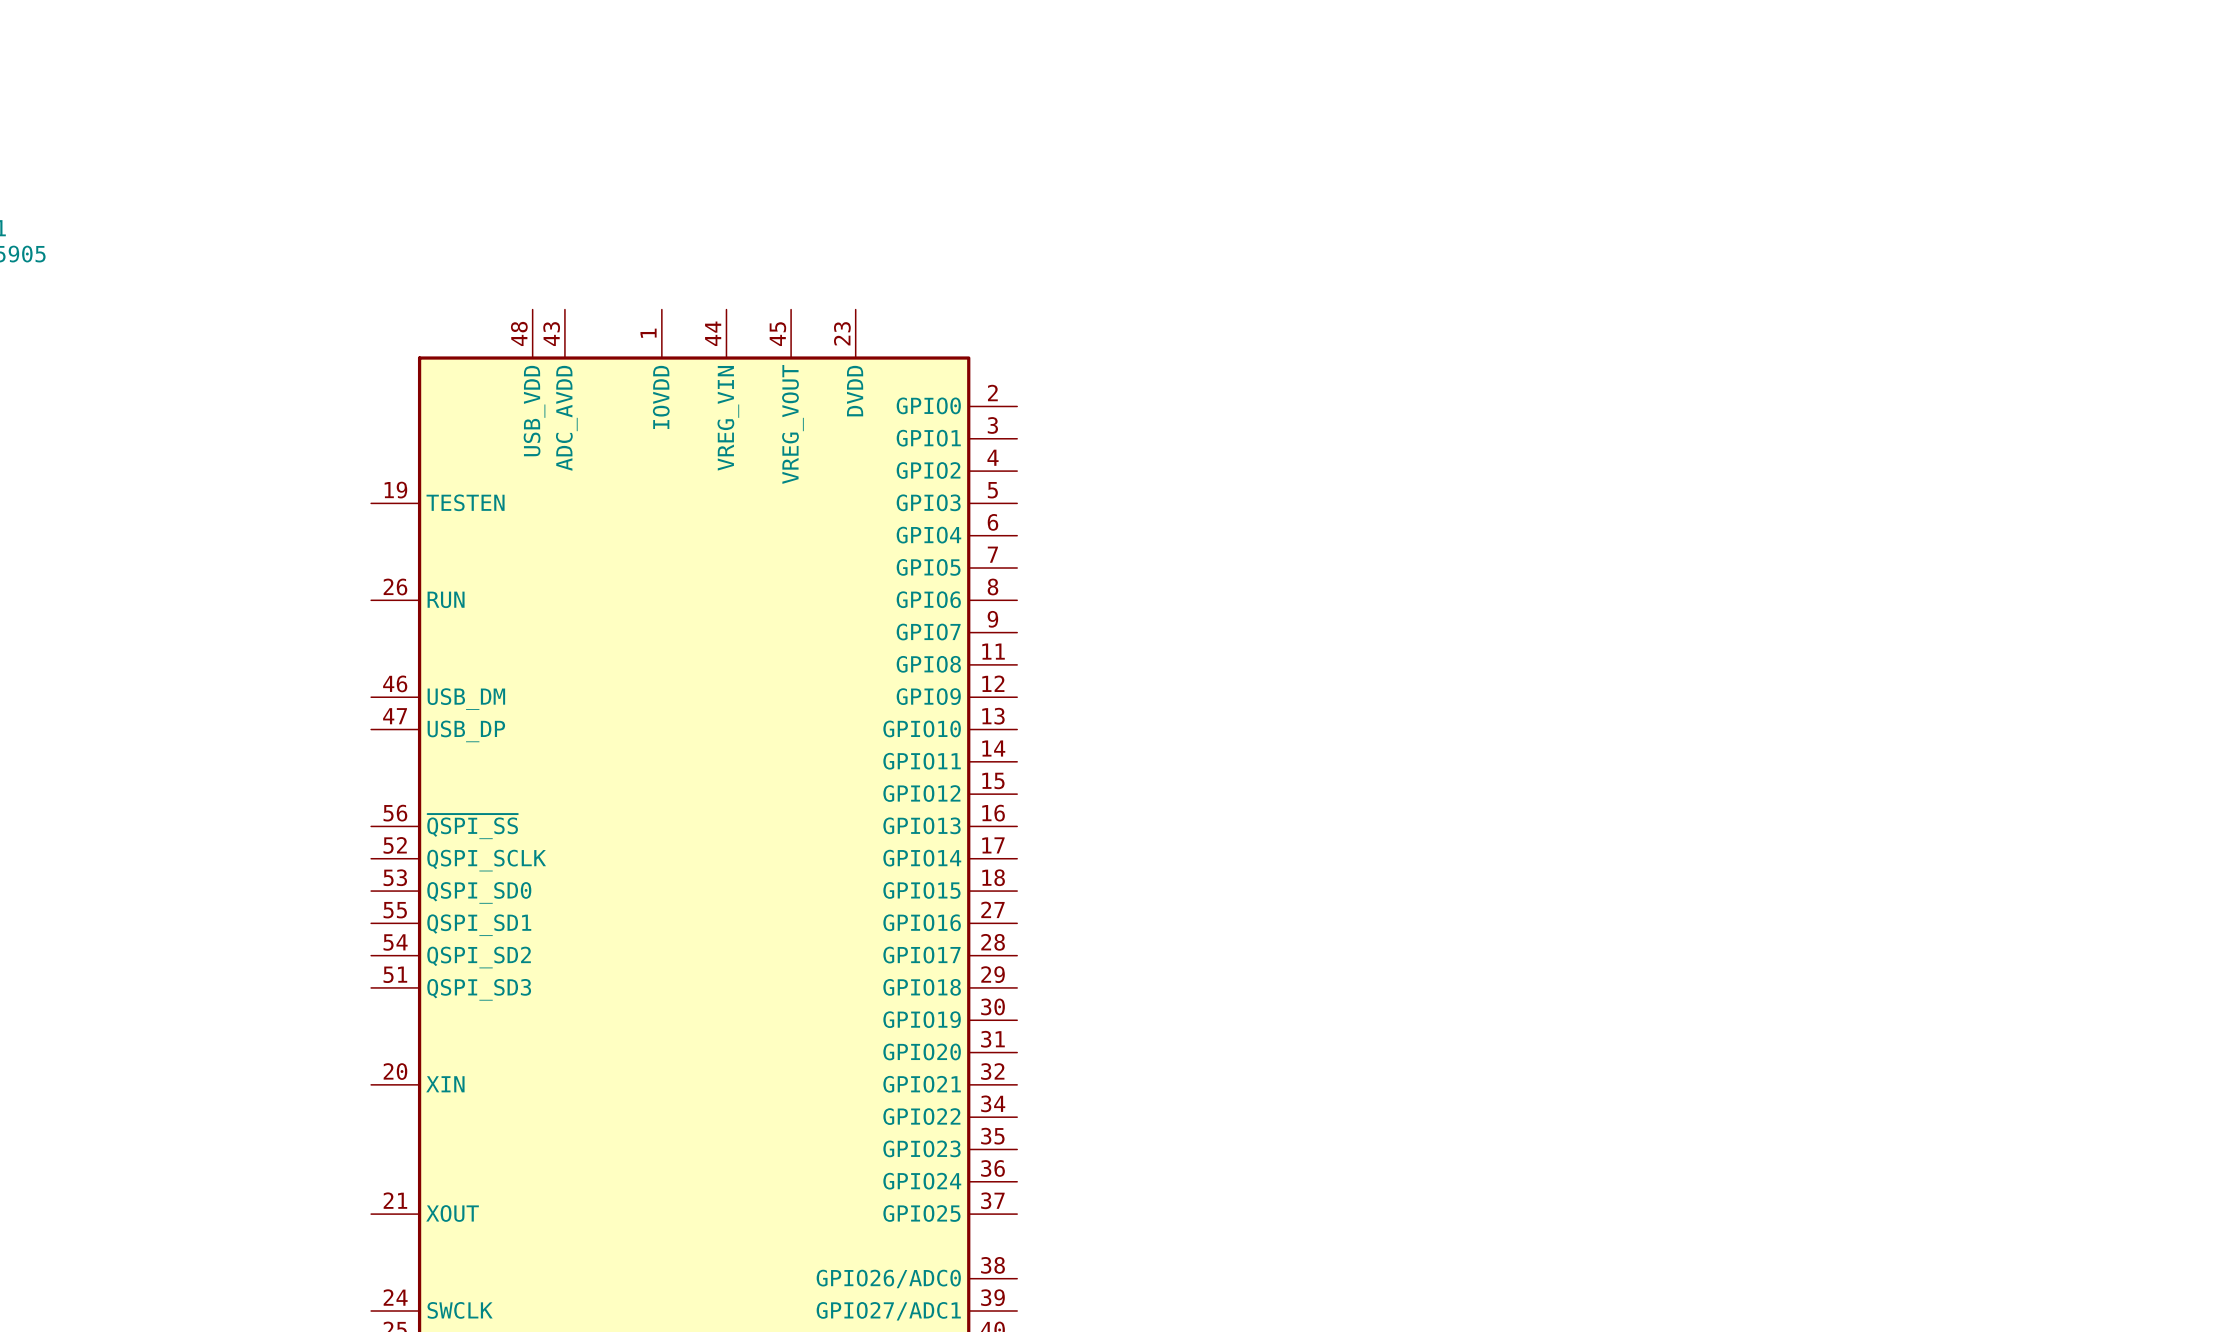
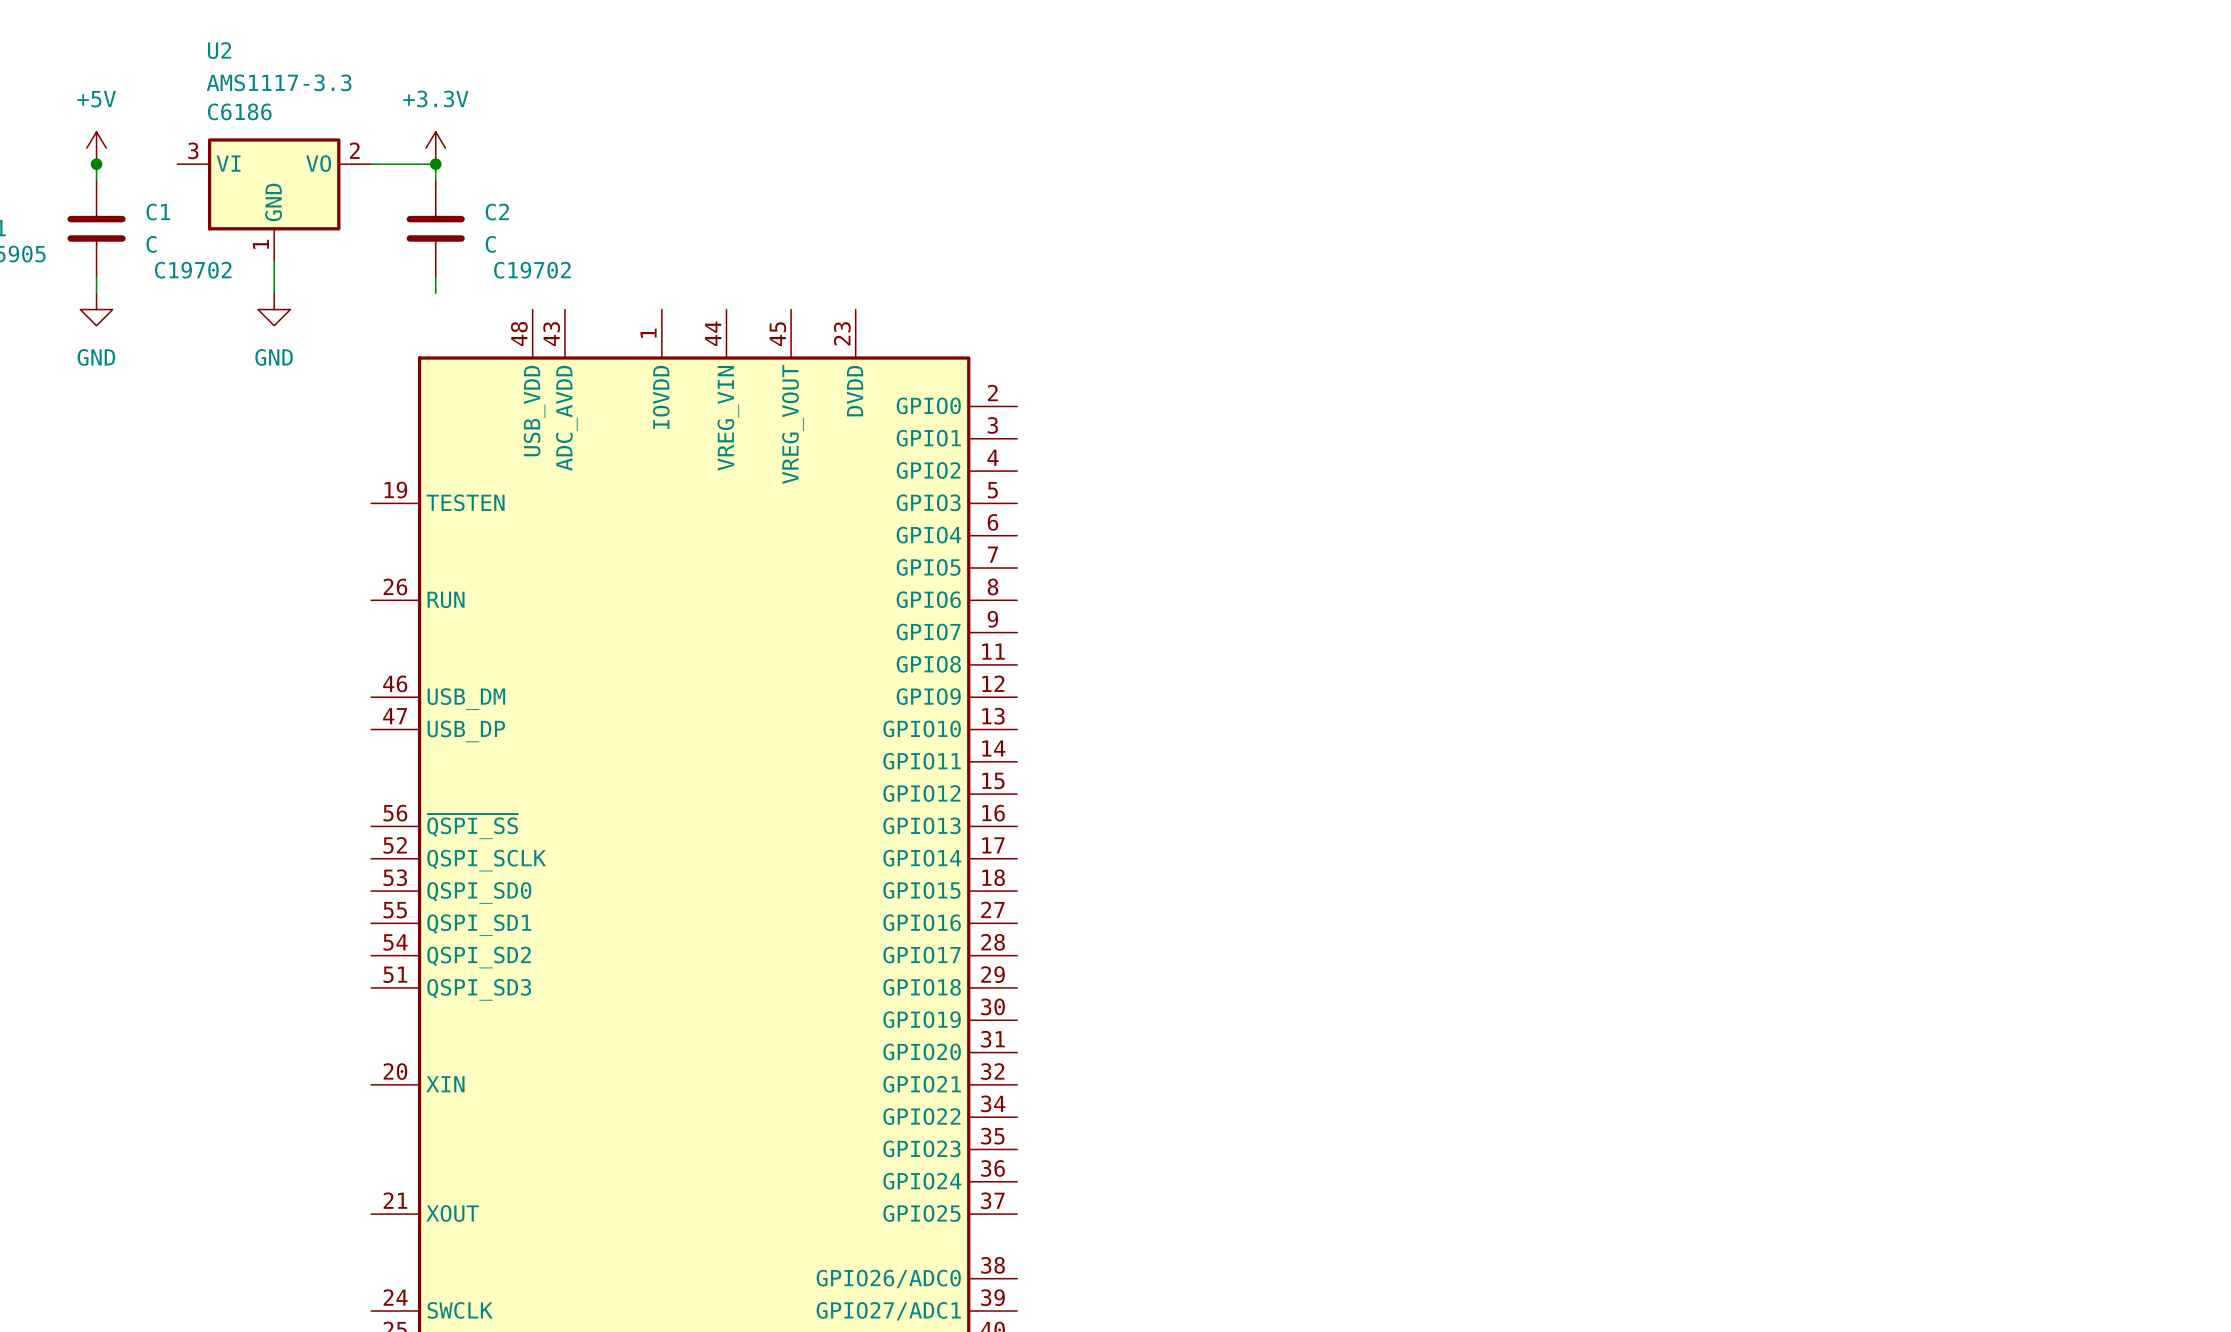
power symbol: none -> +5V (96, 148)
power symbol: none -> +3.3V (435, 148)
wire: none -> (96, 164) (96, 180)
junction: none -> (96, 164)
wire: none -> (371, 164) (435, 164) (435, 180)
junction: none -> (435, 164)
U2: none -> AMS1117-3.3 (274, 199)
C1: none -> C (96, 228)
C2: none -> C (435, 228)
wire: none -> (274, 261) (274, 293)
wire: none -> (96, 277) (96, 293)
wire: none -> (435, 277) (435, 293)
power symbol: none -> GND (96, 309)
power symbol: none -> GND (274, 309)

